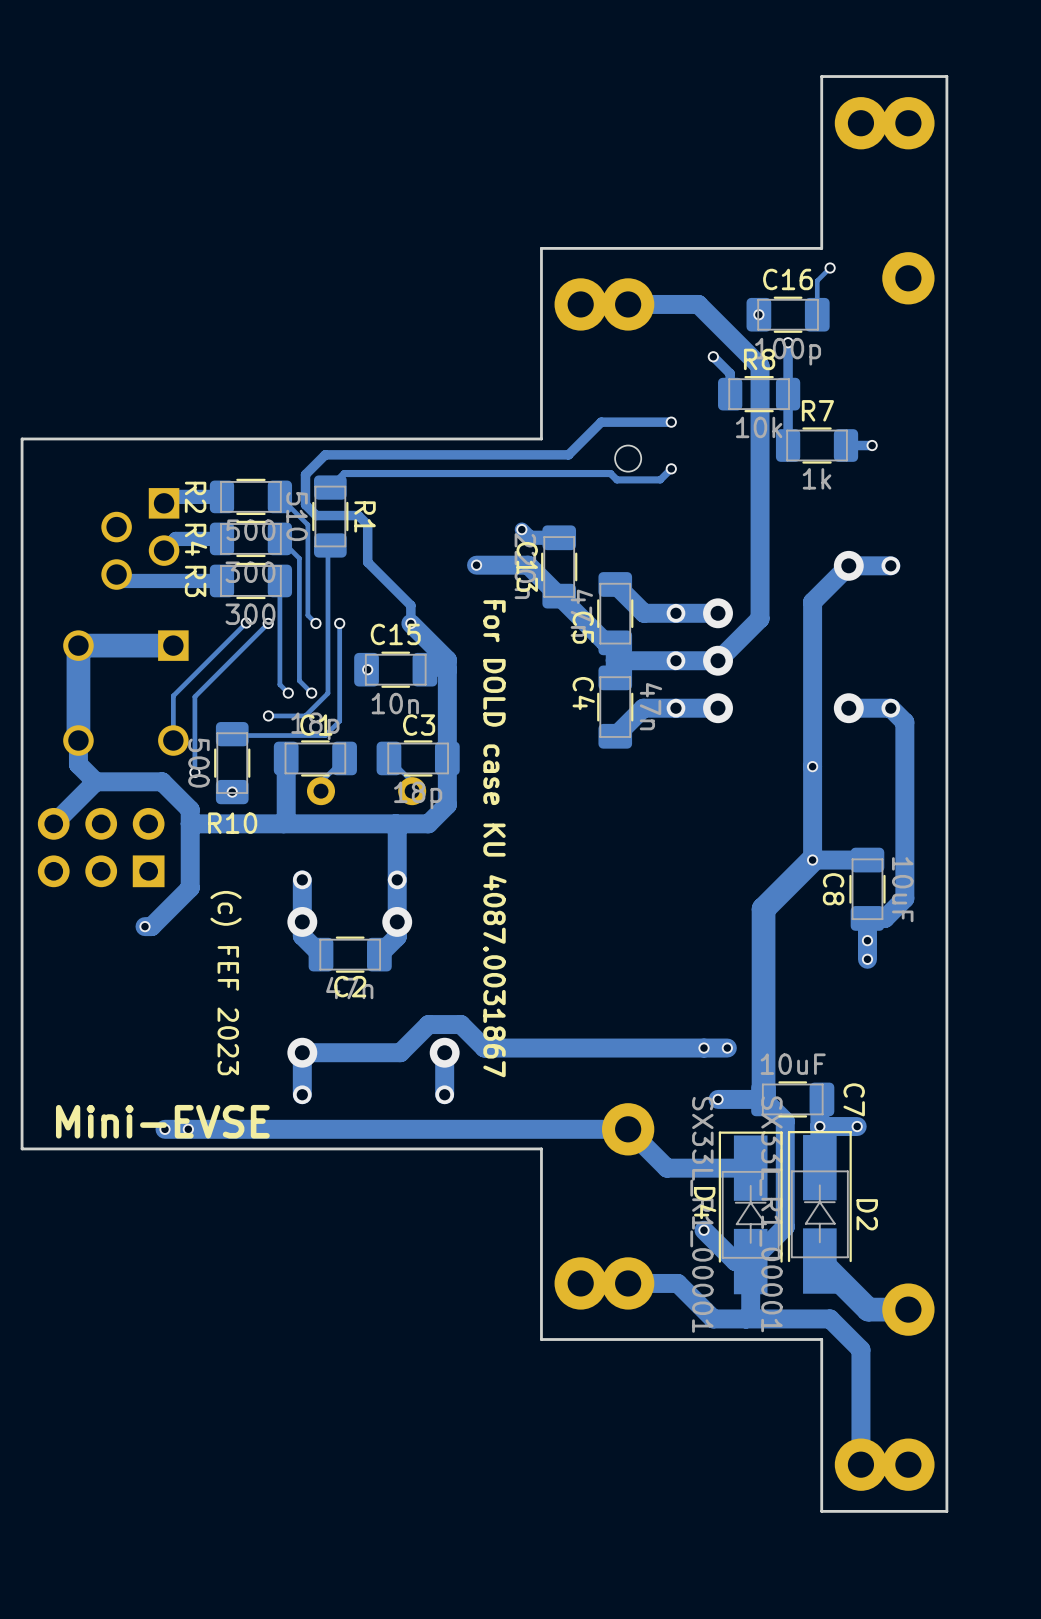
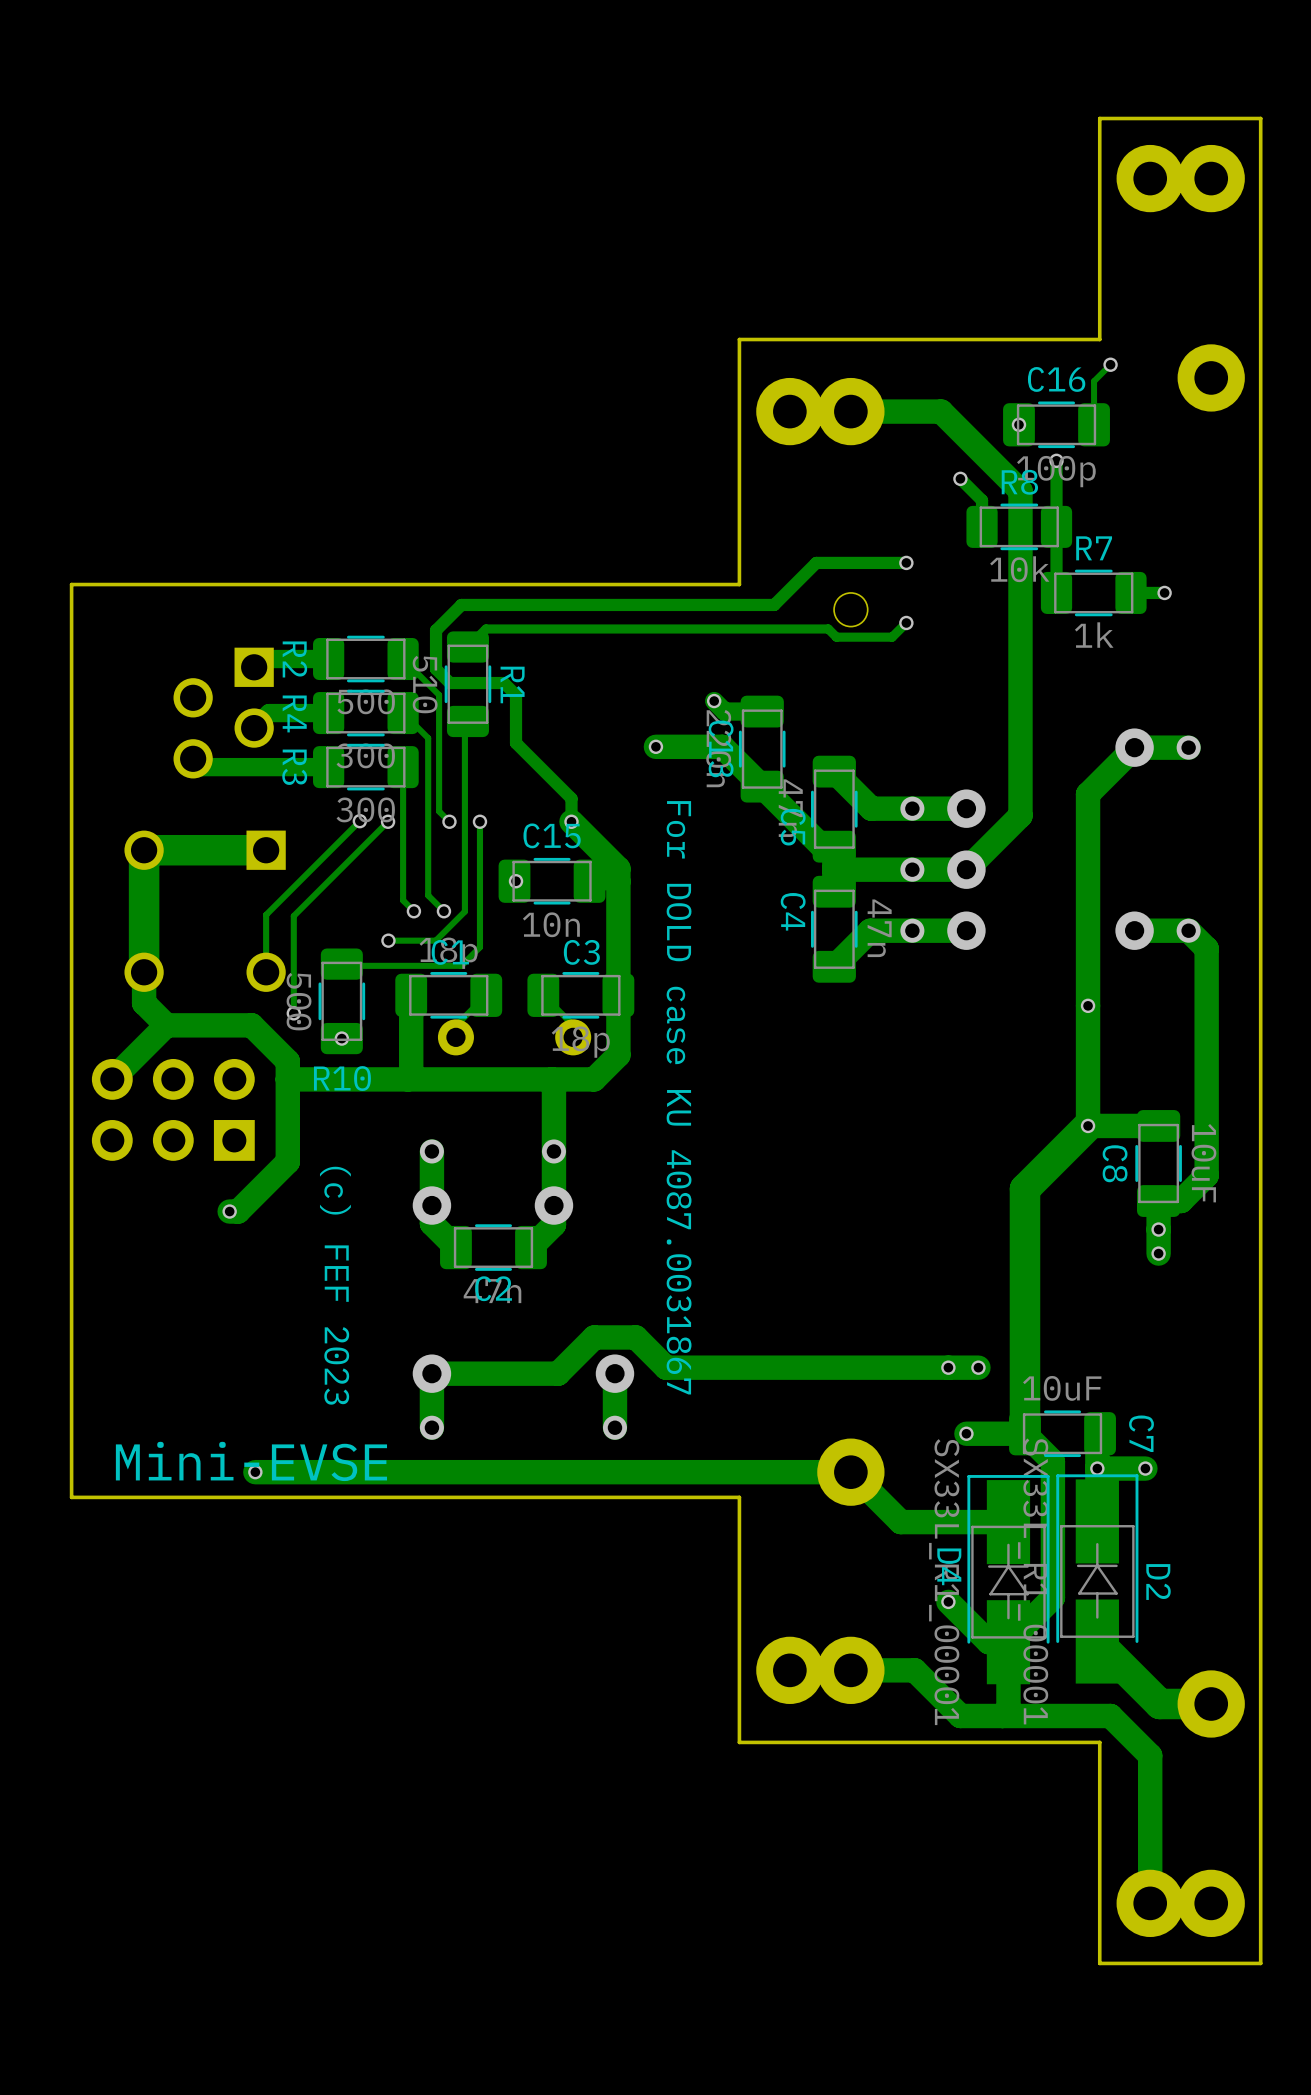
via: (188, 1129) -> none

